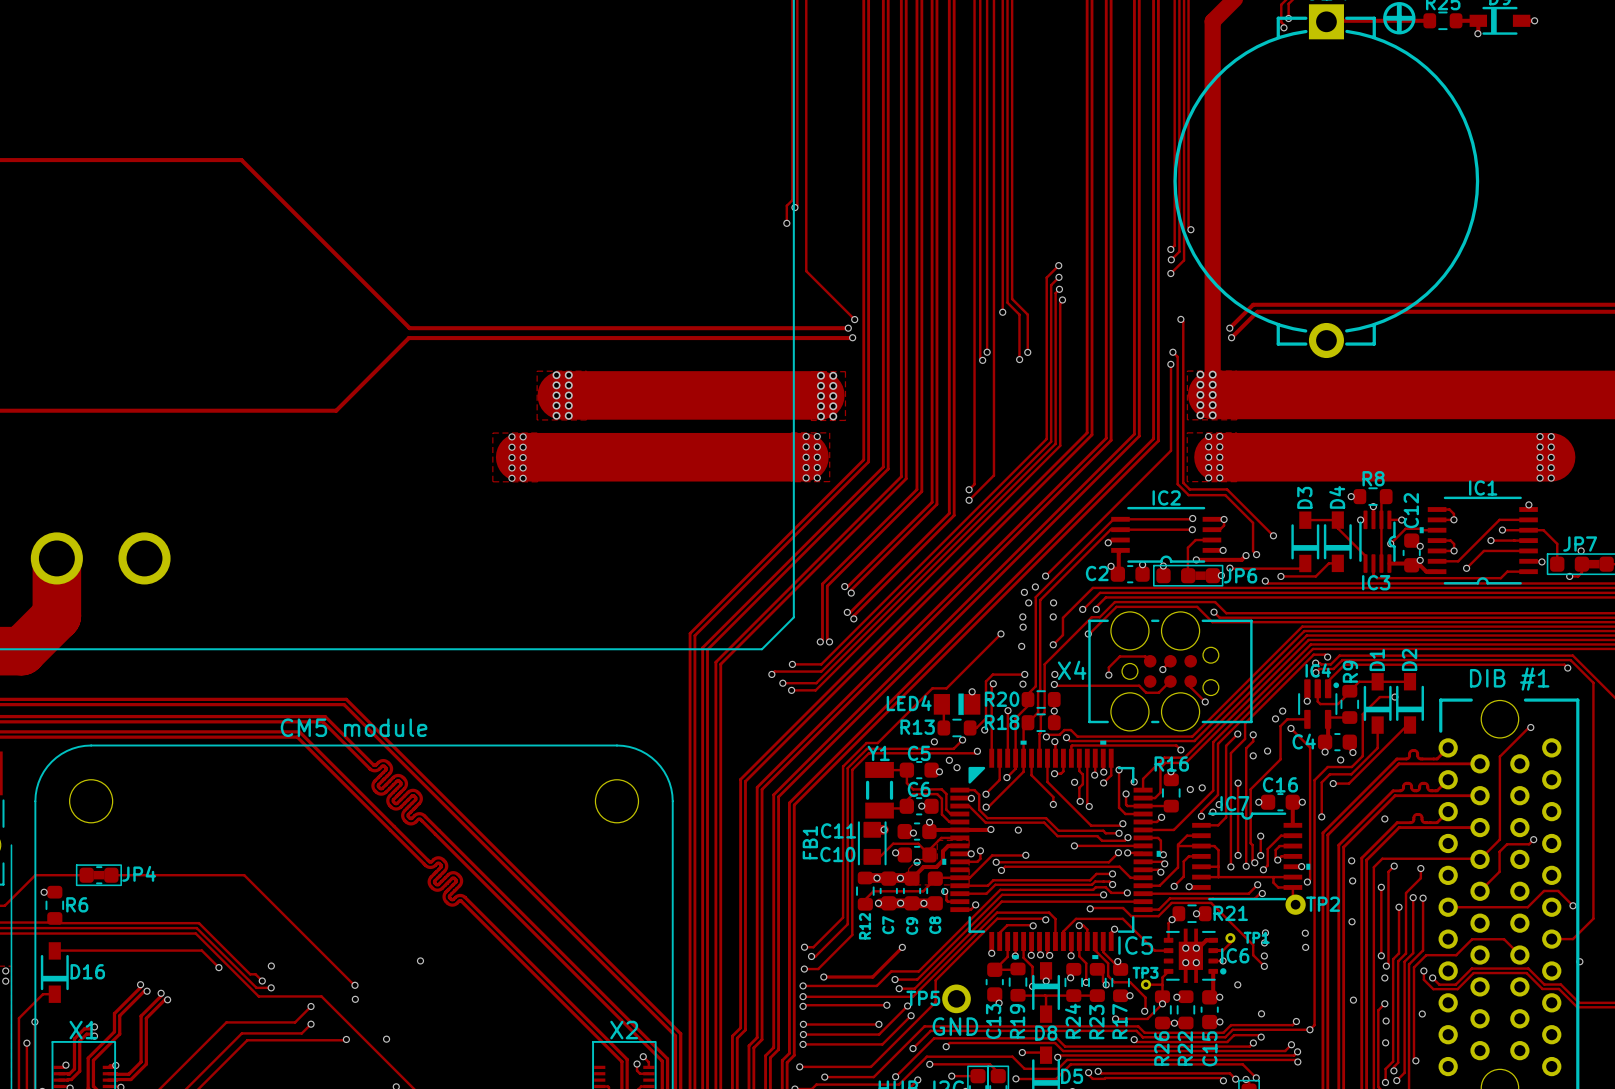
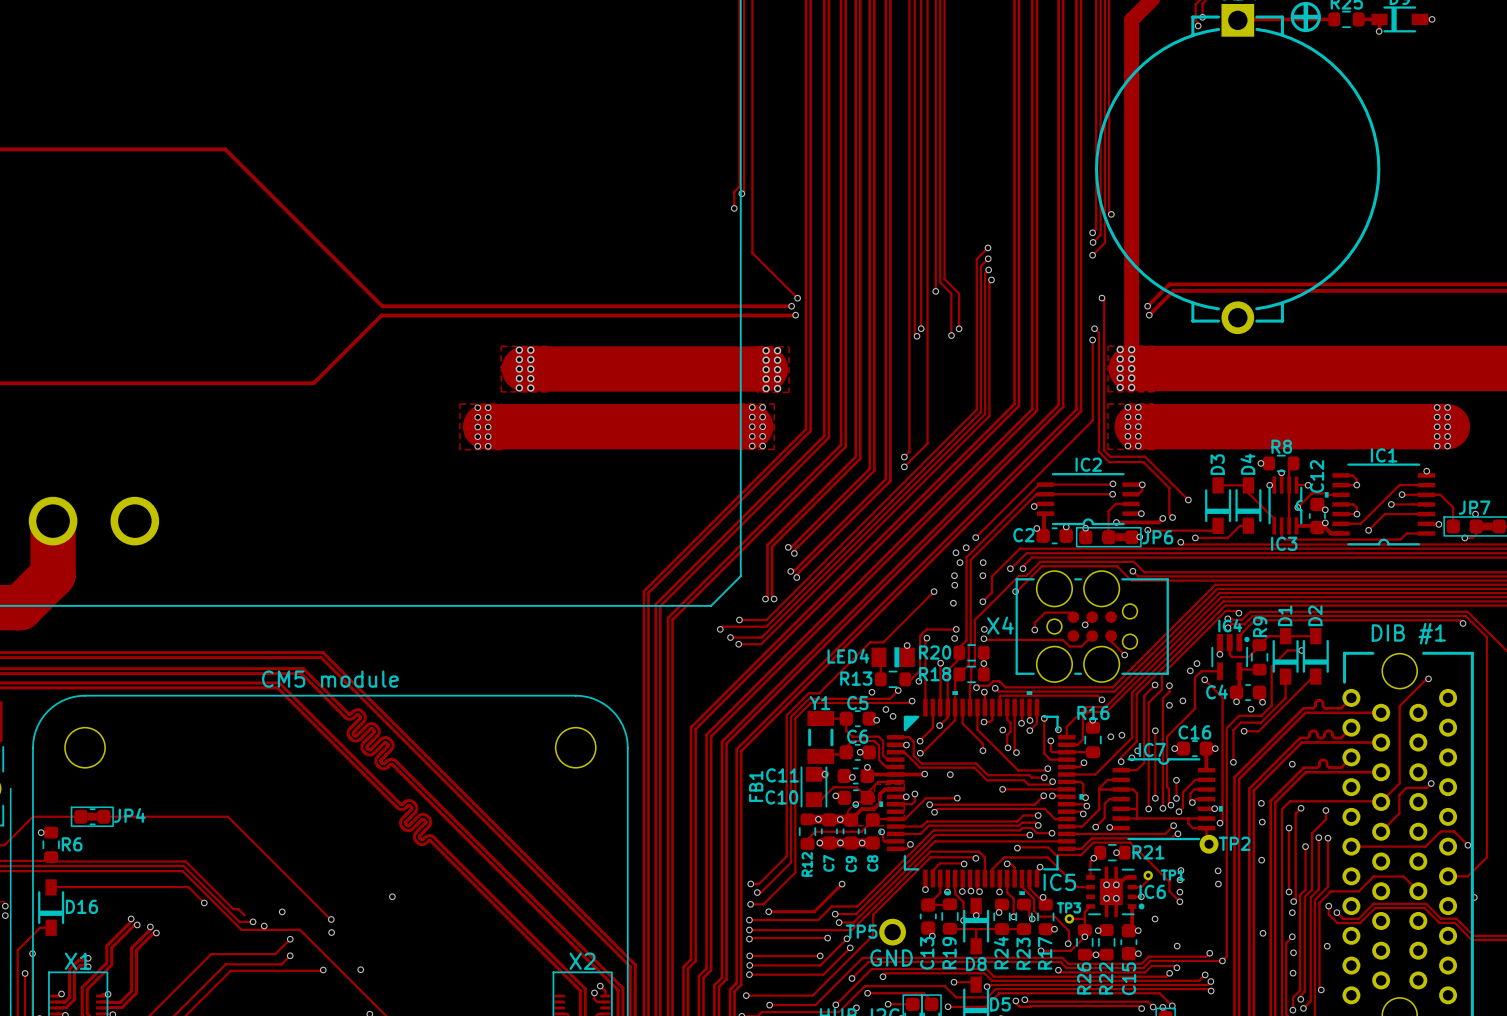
via: (271, 966) -> none
via: none -> (282, 911)
via: (262, 981) -> none
via: none -> (264, 926)

